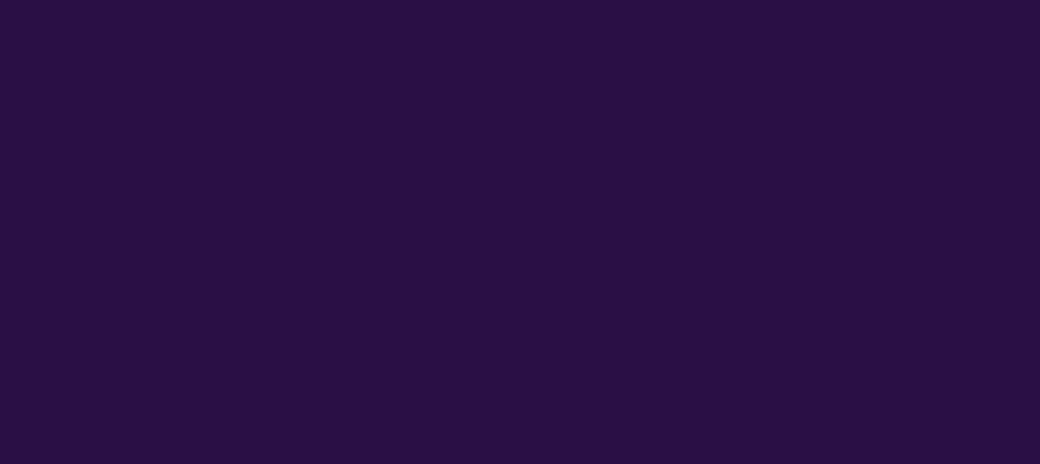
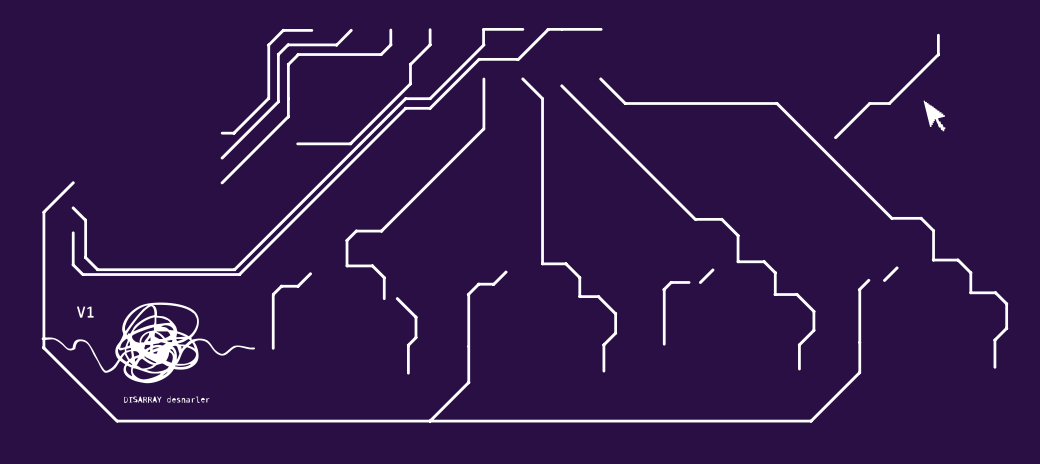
drawing: none -> [41, 27, 1009, 423]
drawing: none -> [521, 77, 618, 373]
drawing: none -> [883, 266, 899, 282]
drawing: none -> [662, 268, 715, 346]

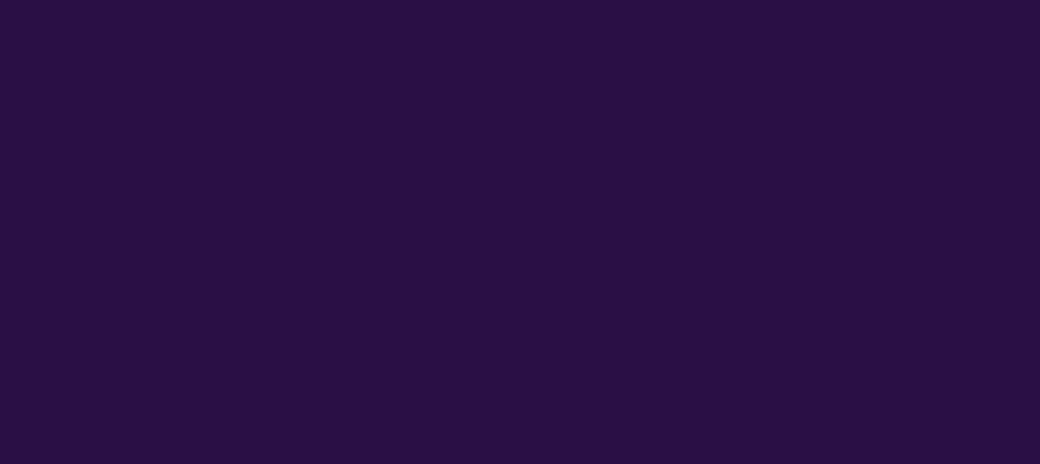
drawing: [41, 27, 1009, 423] -> none
drawing: [521, 77, 618, 373] -> none
drawing: [883, 266, 899, 282] -> none
drawing: [662, 268, 715, 346] -> none

